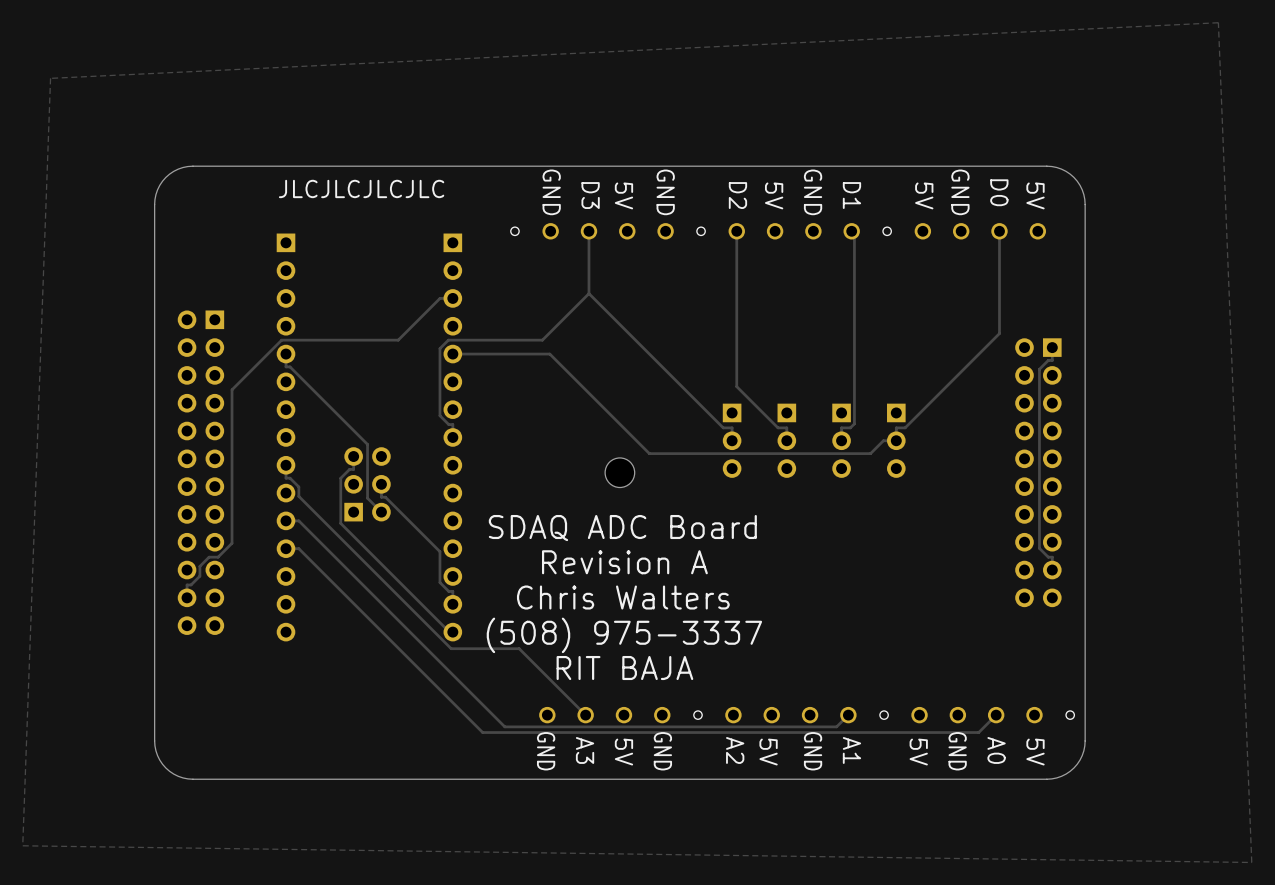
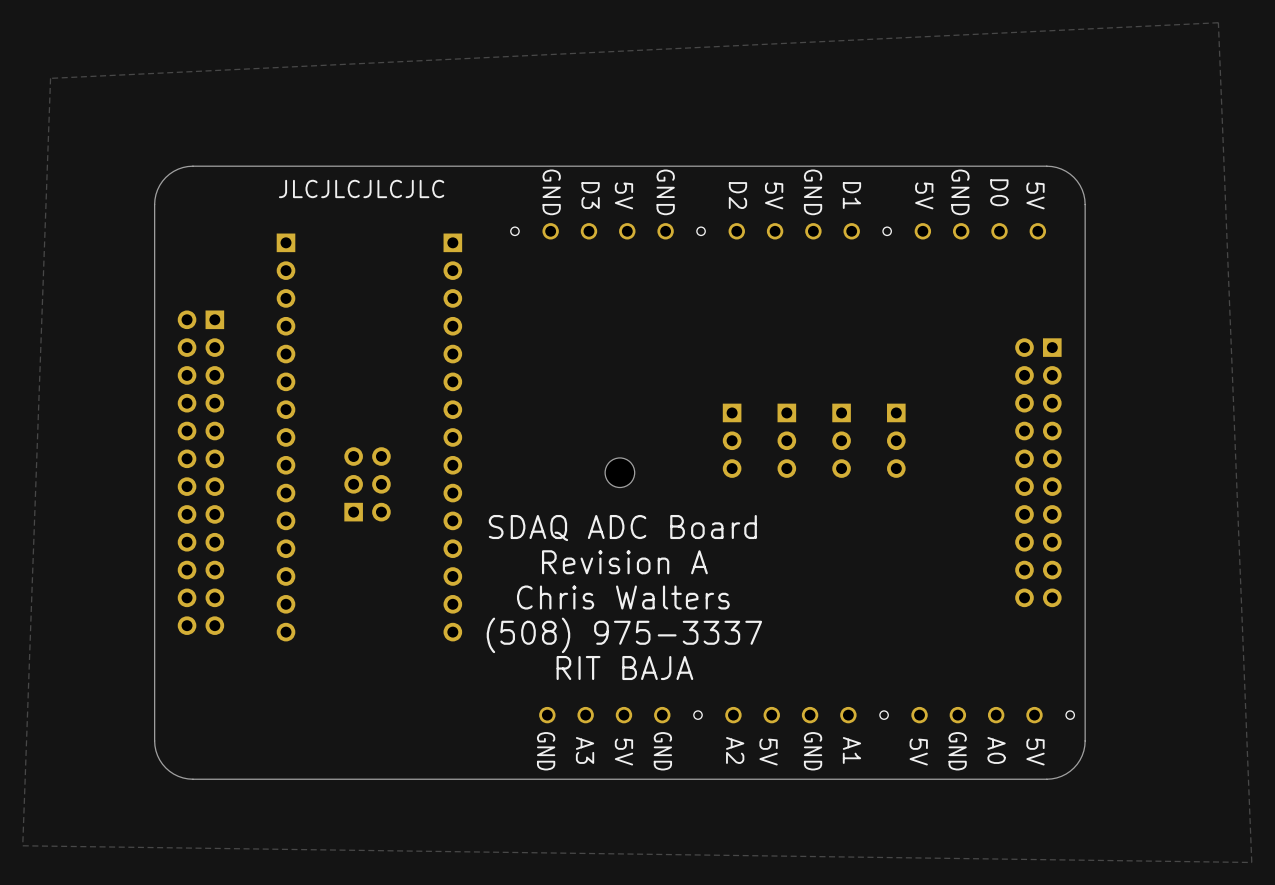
track: (588, 231) (588, 293) -> none
track: (736, 231) (736, 386) (777, 427) (786, 427) (786, 440) -> none
track: (851, 231) (854, 234) (854, 423) (850, 427) (841, 427) (841, 440) -> none
track: (999, 231) (999, 333) (905, 427) (896, 427) (896, 440) (883, 440) (870, 453) (649, 453) (549, 354) (452, 354) -> none
track: (588, 293) (723, 427) (732, 427) (732, 440) -> none
track: (588, 293) (542, 340) (448, 340) (439, 348) (439, 415) (448, 424) (452, 424) (452, 437) -> none
track: (452, 298) (439, 298) (398, 340) (281, 340) (232, 389) (232, 543) (218, 557) (209, 557) (199, 566) (199, 576) (191, 584) (187, 584) (187, 597) -> none
track: (1052, 347) (1052, 360) (1048, 360) (1039, 369) (1039, 548) (1048, 557) (1052, 557) (1052, 570) -> none
track: (286, 354) (286, 366) (290, 366) (367, 444) (367, 498) (381, 512) -> none
track: (353, 456) (353, 469) (349, 469) (340, 478) (340, 523) (449, 632) (452, 632) -> none
track: (286, 465) (286, 478) (290, 478) (298, 486) (298, 496) (451, 648) (519, 648) (585, 715) -> none
track: (381, 484) (381, 497) (385, 497) (439, 551) (439, 582) (448, 591) (452, 591) (452, 604) -> none
track: (286, 520) (298, 520) (504, 726) (836, 726) (848, 715) -> none
track: (286, 548) (298, 548) (482, 732) (978, 732) (996, 715) -> none

